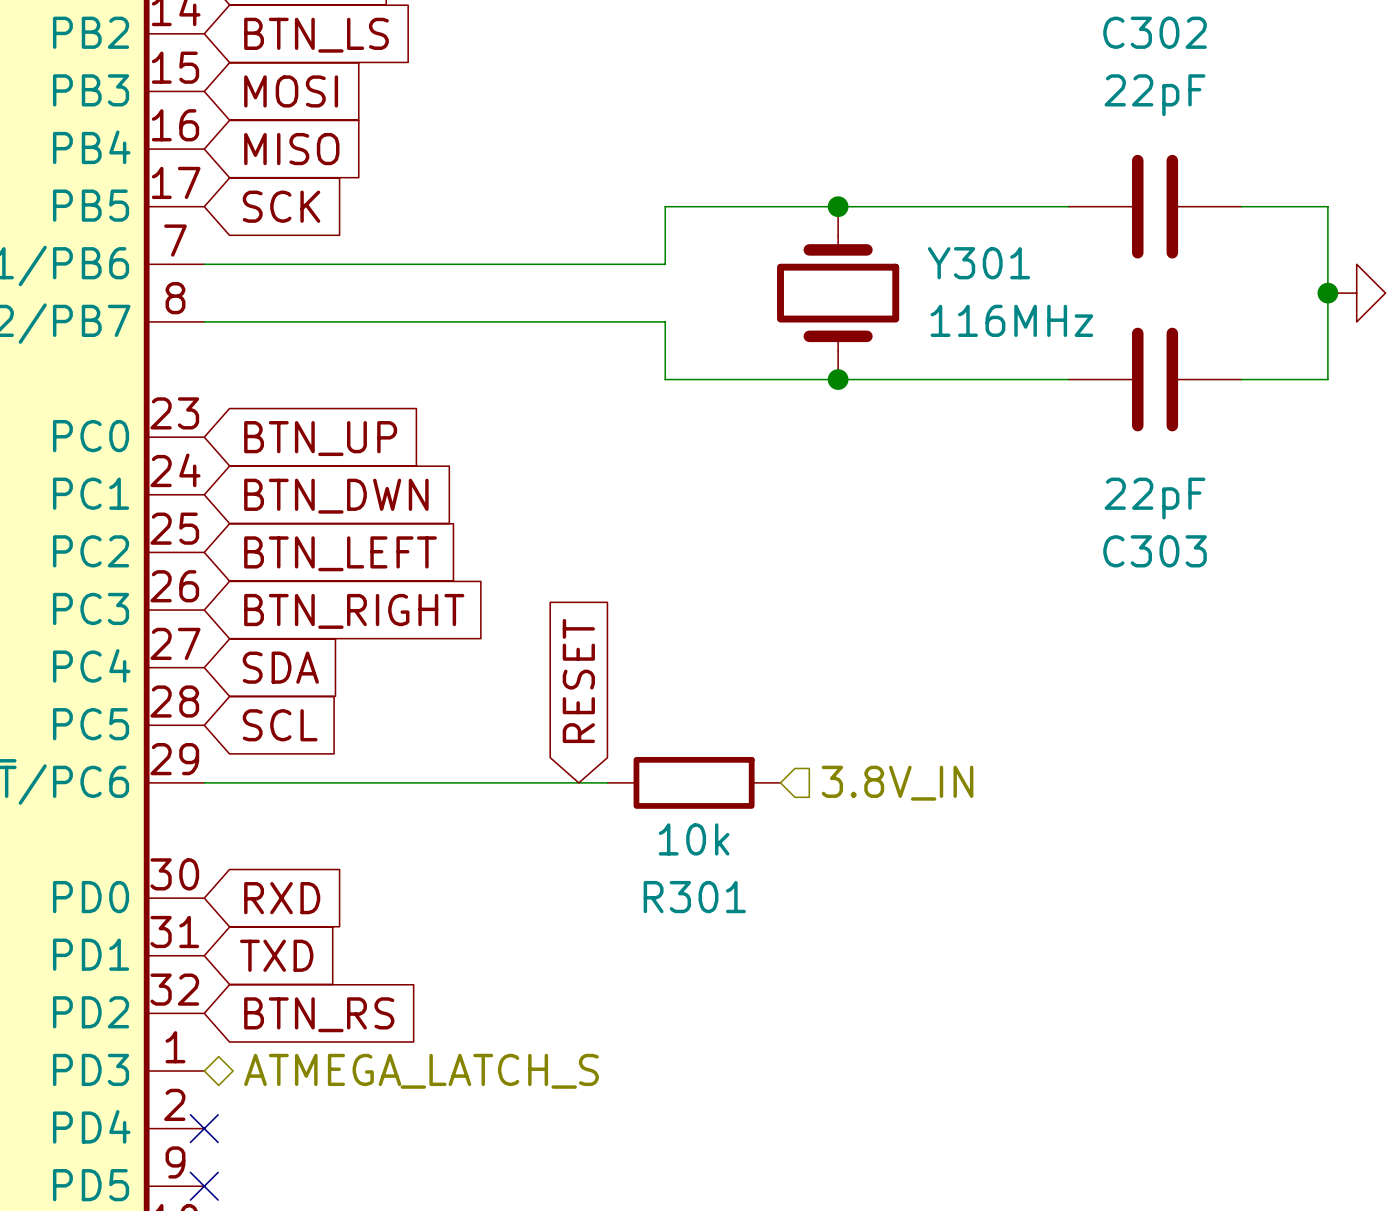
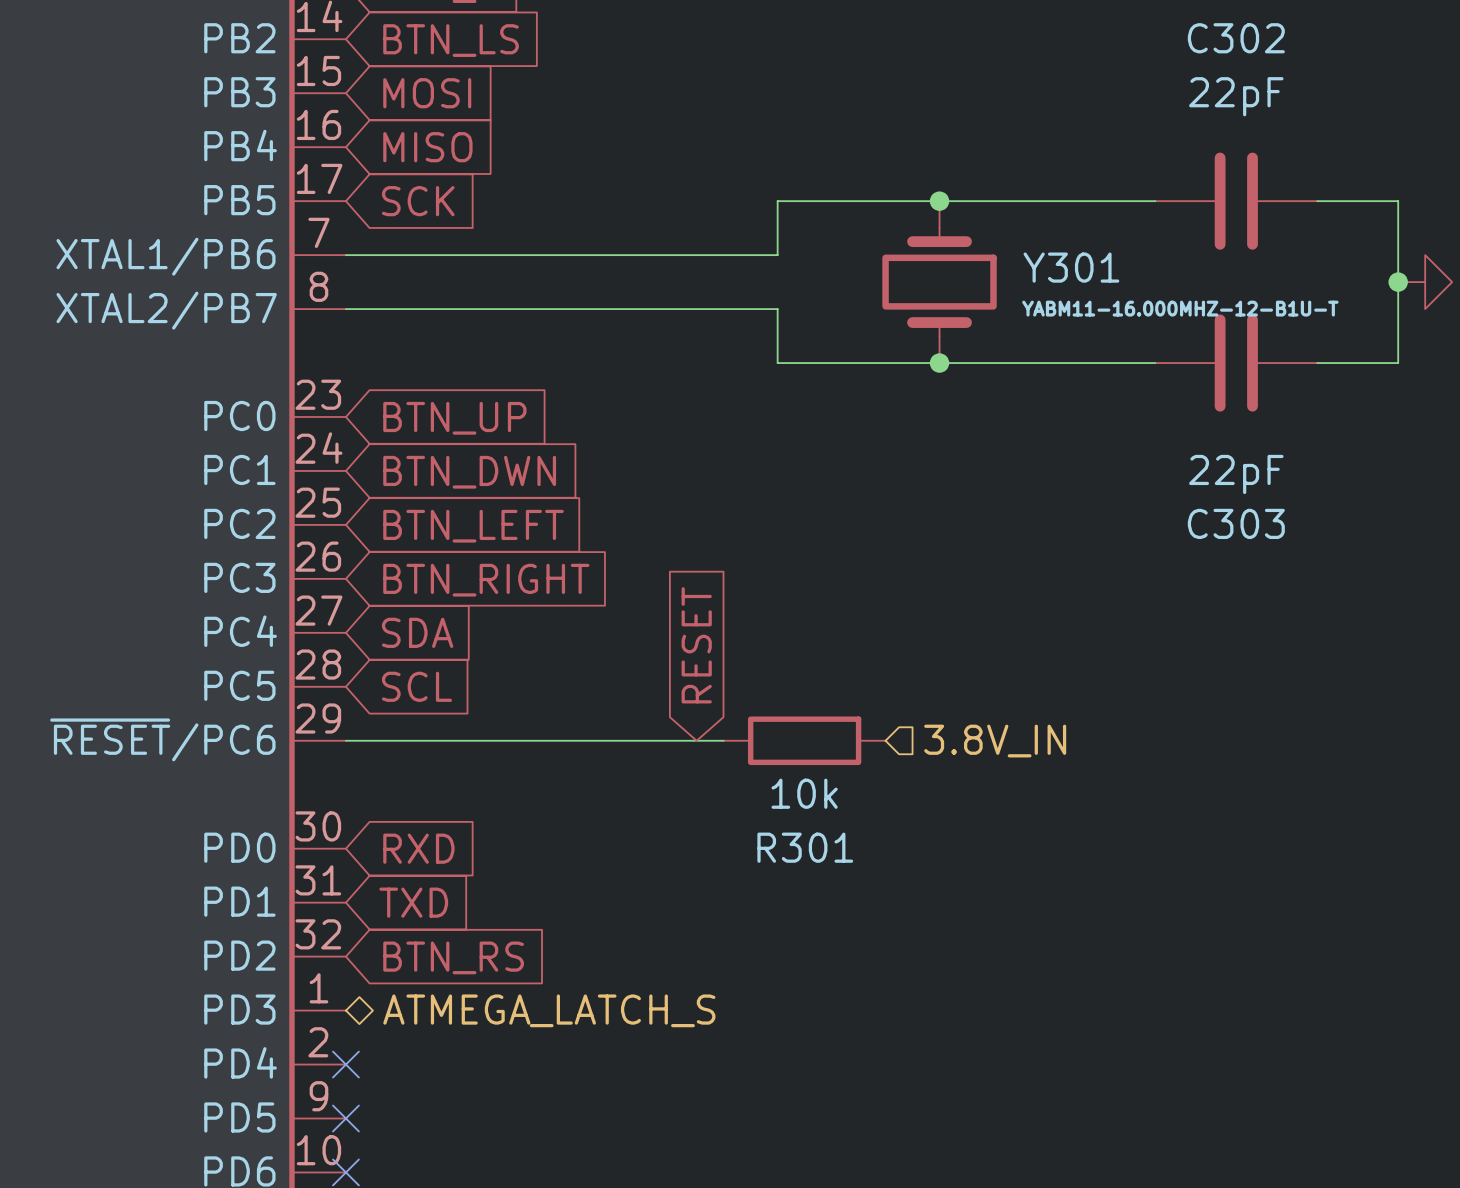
Y301 name position: Y301 (978, 263) -> Y301 (1071, 267)
Y301 value: 116MHz (1011, 320) -> YABM11-16.000MHZ-12-B1U-T (1180, 308)

